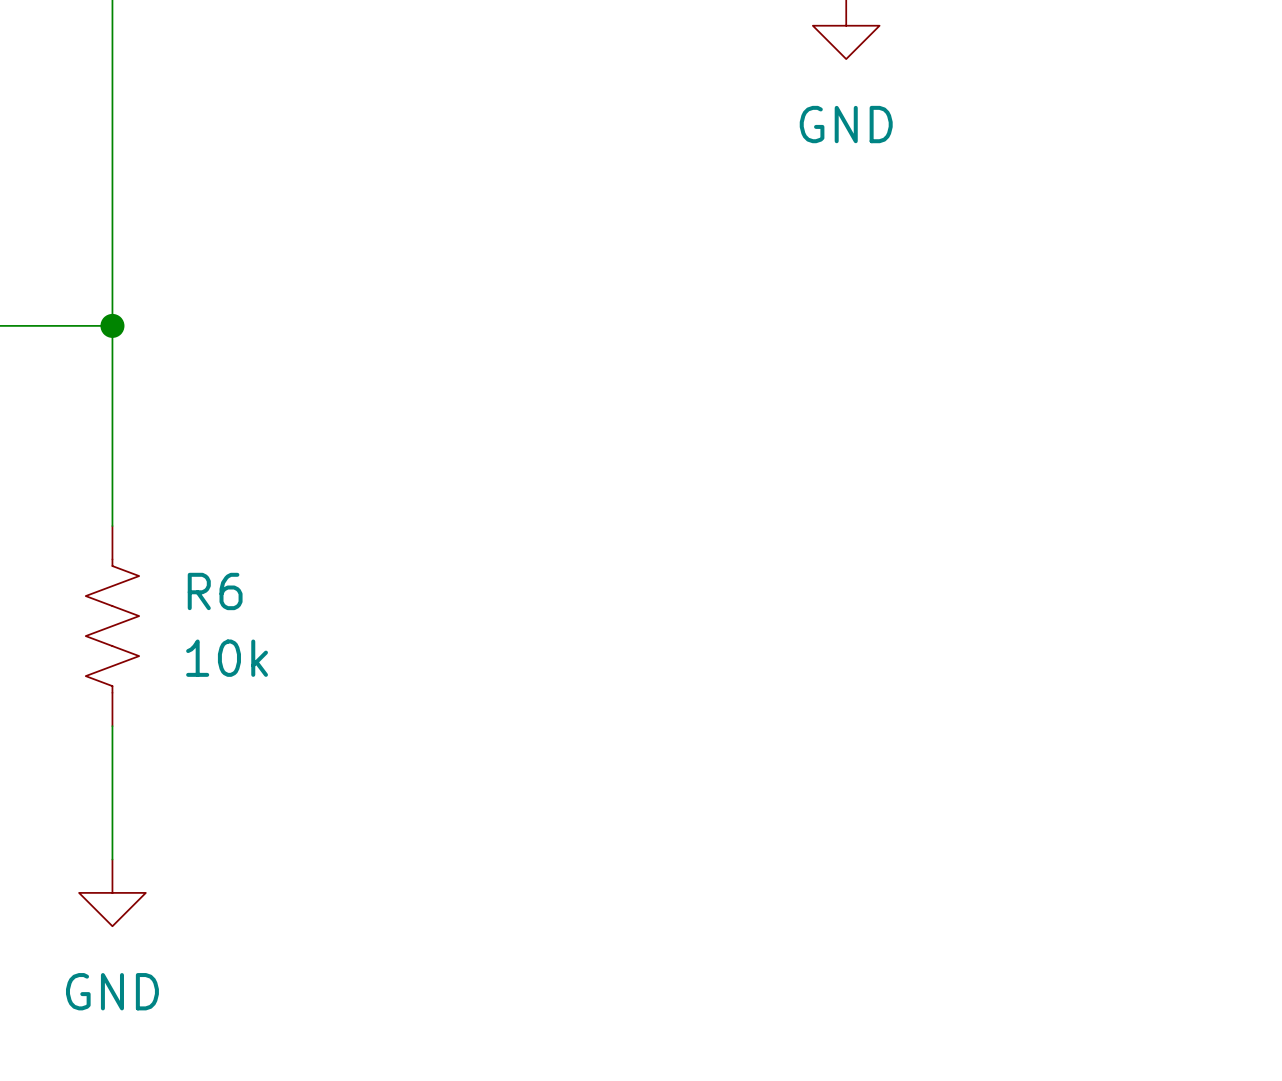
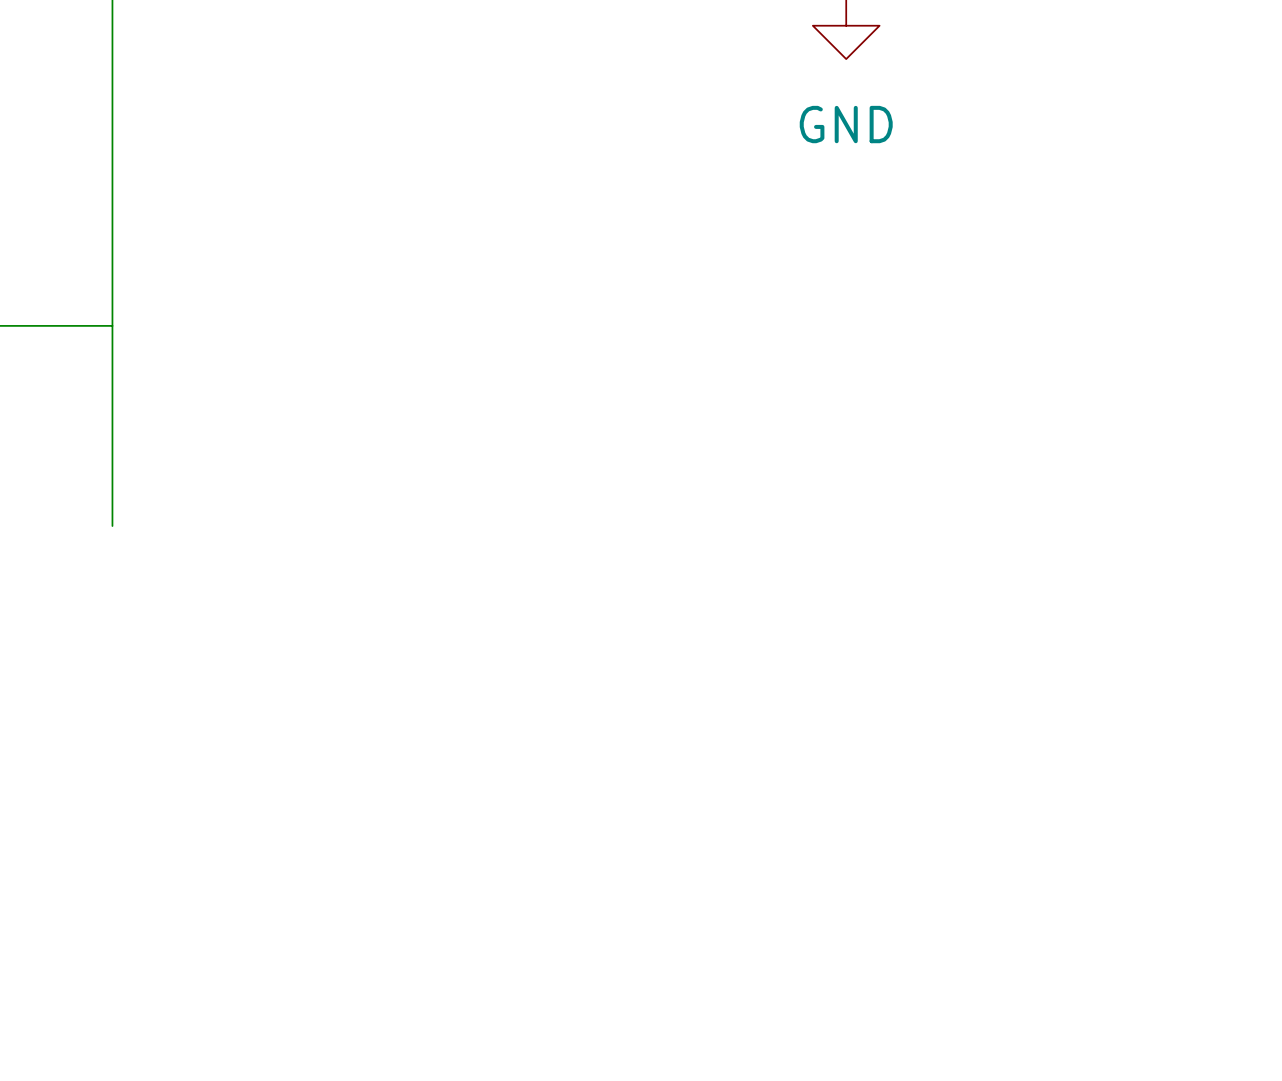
junction: (112, 325) -> none
R6: 10k (112, 626) -> none
wire: (112, 726) (112, 859) -> none
power symbol: GND (112, 892) -> none

